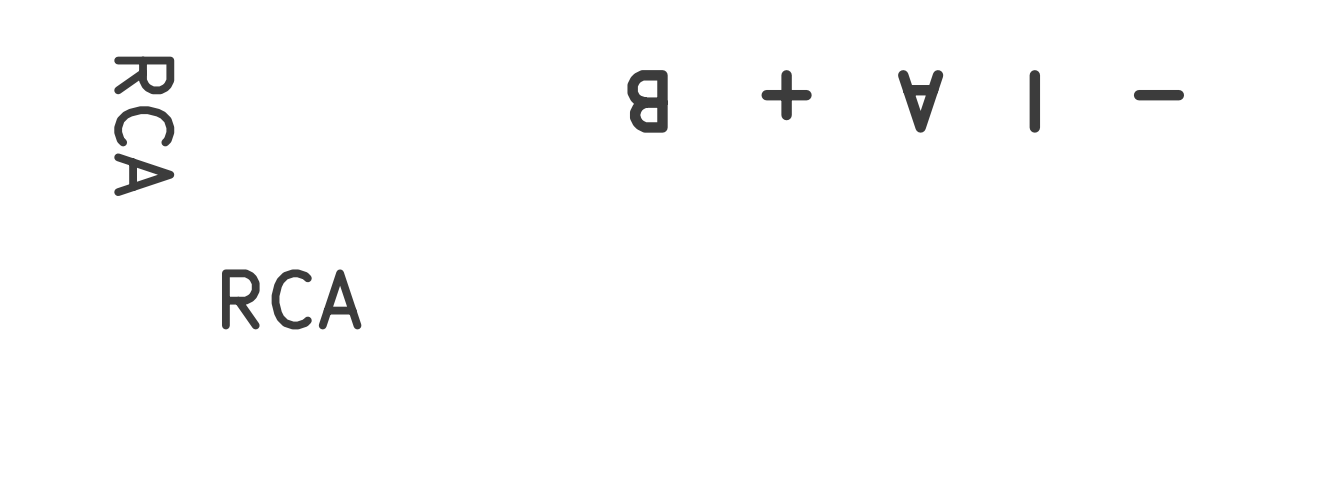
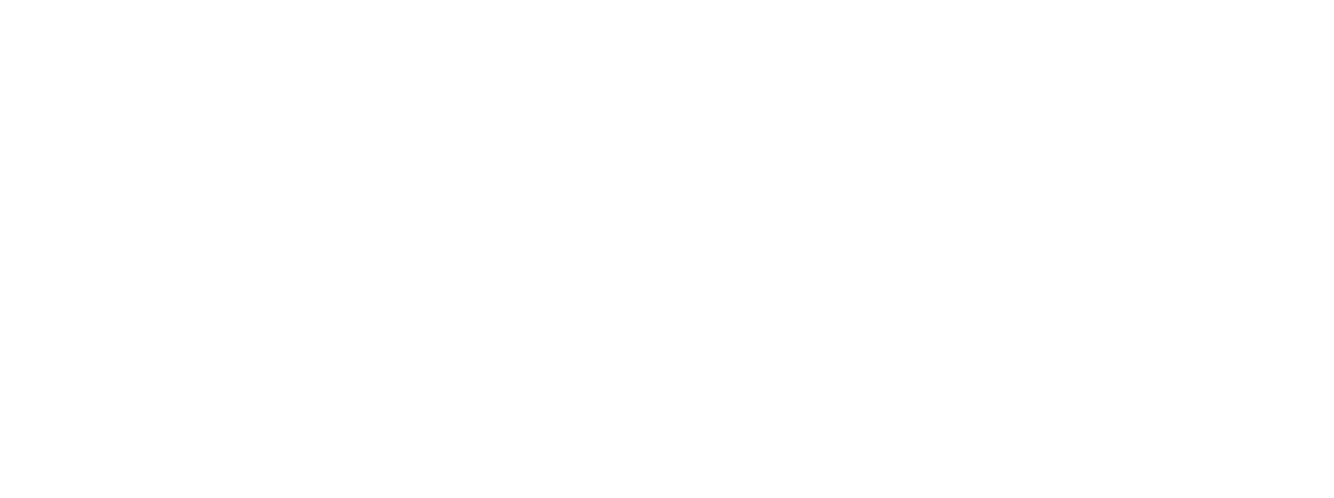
text: - I A + B (905, 101) -> none
text: RCA (144, 126) -> none
text: RCA (291, 299) -> none

